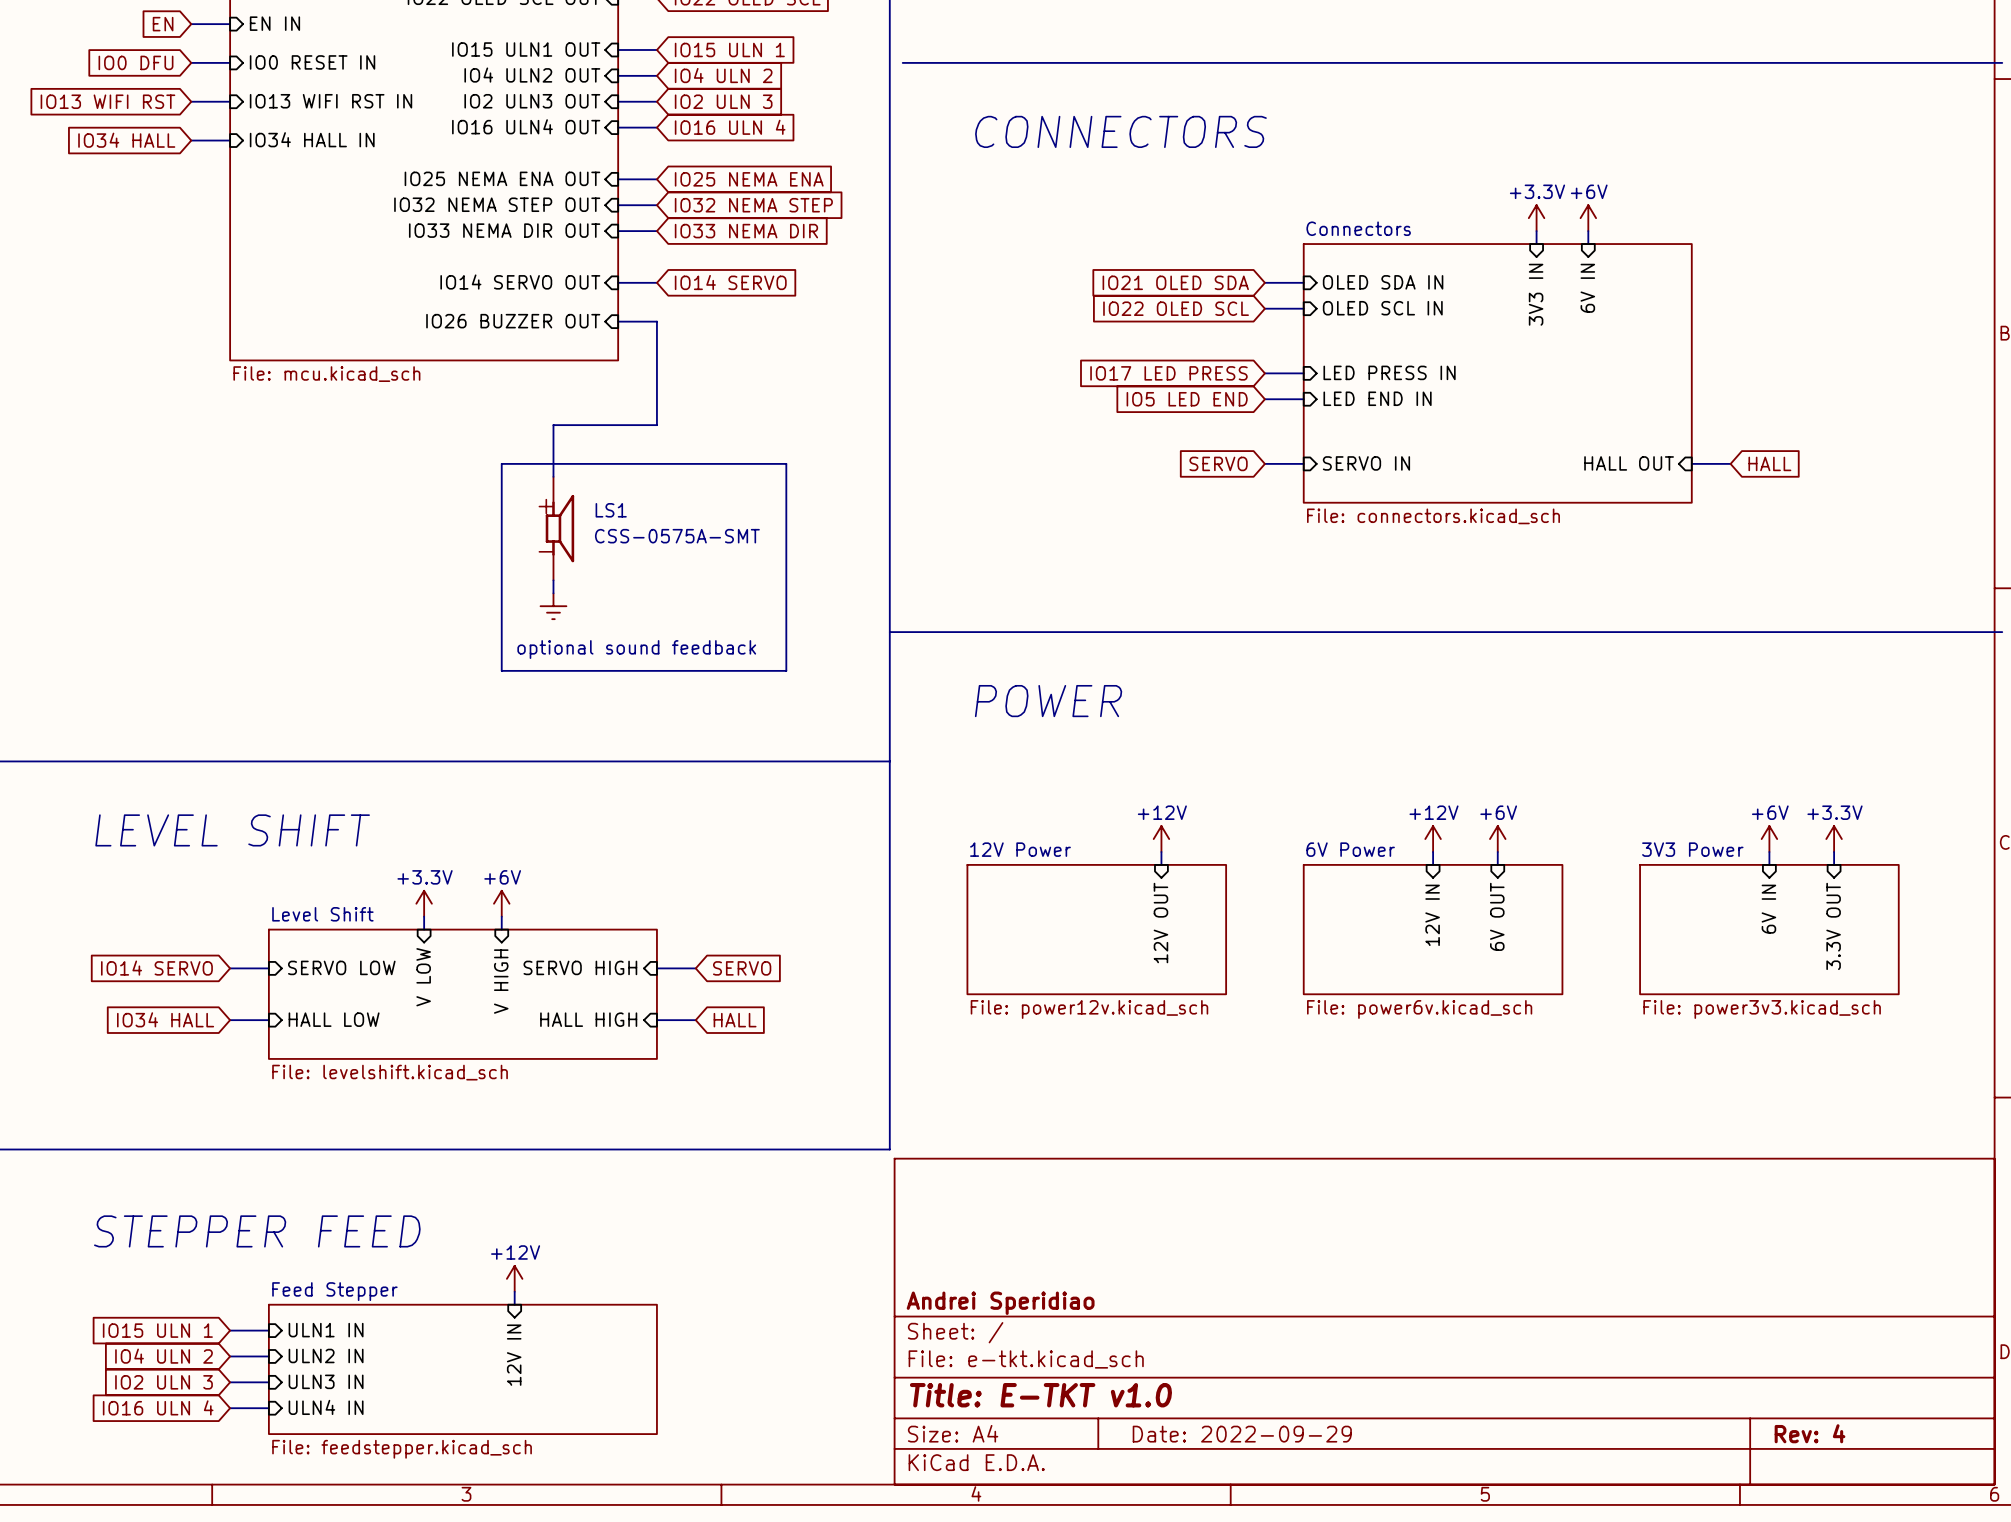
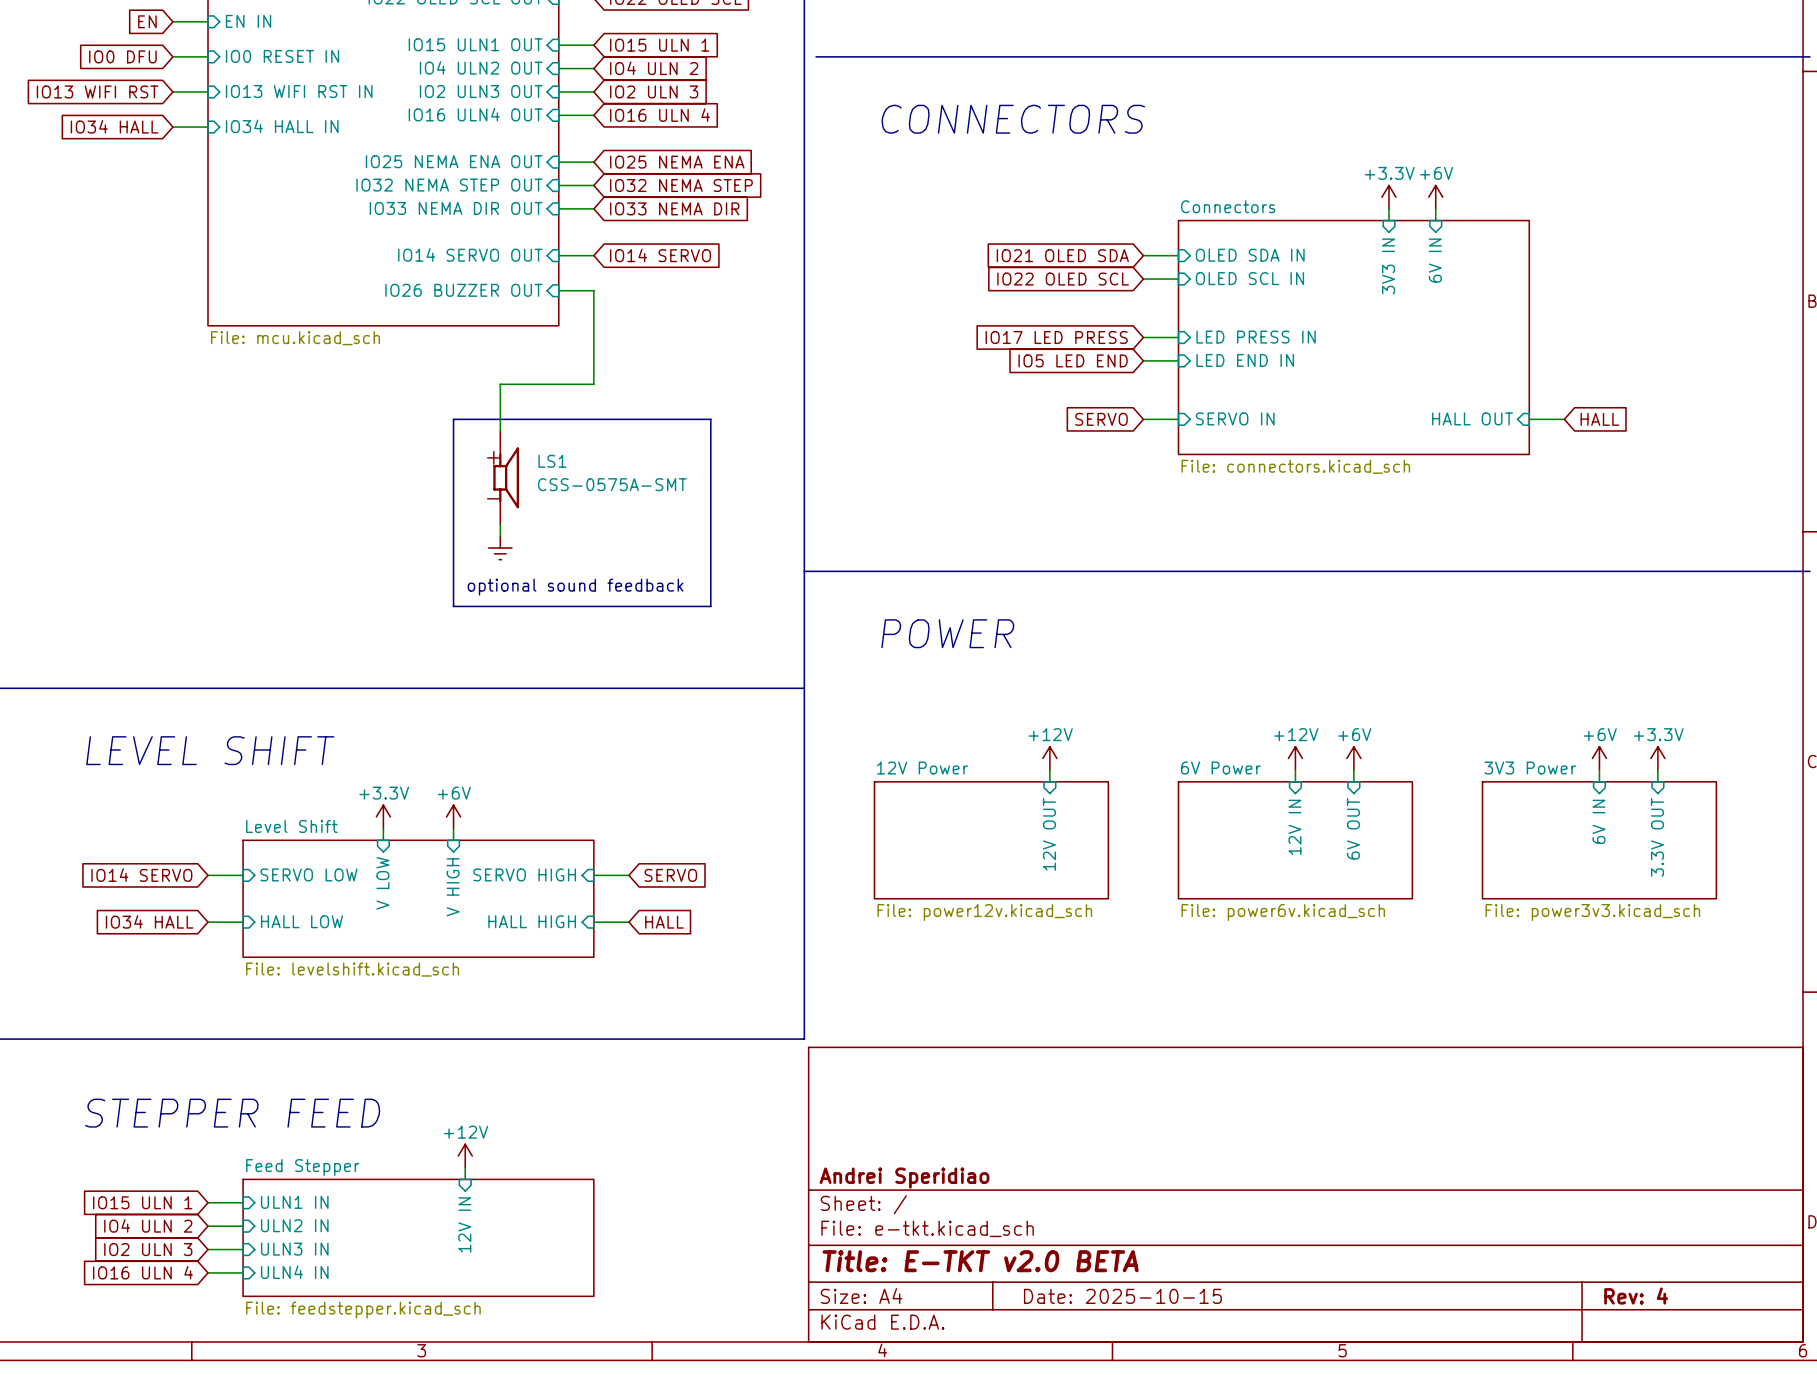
title block: Title: E-TKT v1.0 (1040, 1395) -> Title: E-TKT v2.0 BETA (980, 1261)
title block: Date: 2022-09-29 (1242, 1434) -> Date: 2025-10-15 (1122, 1296)

